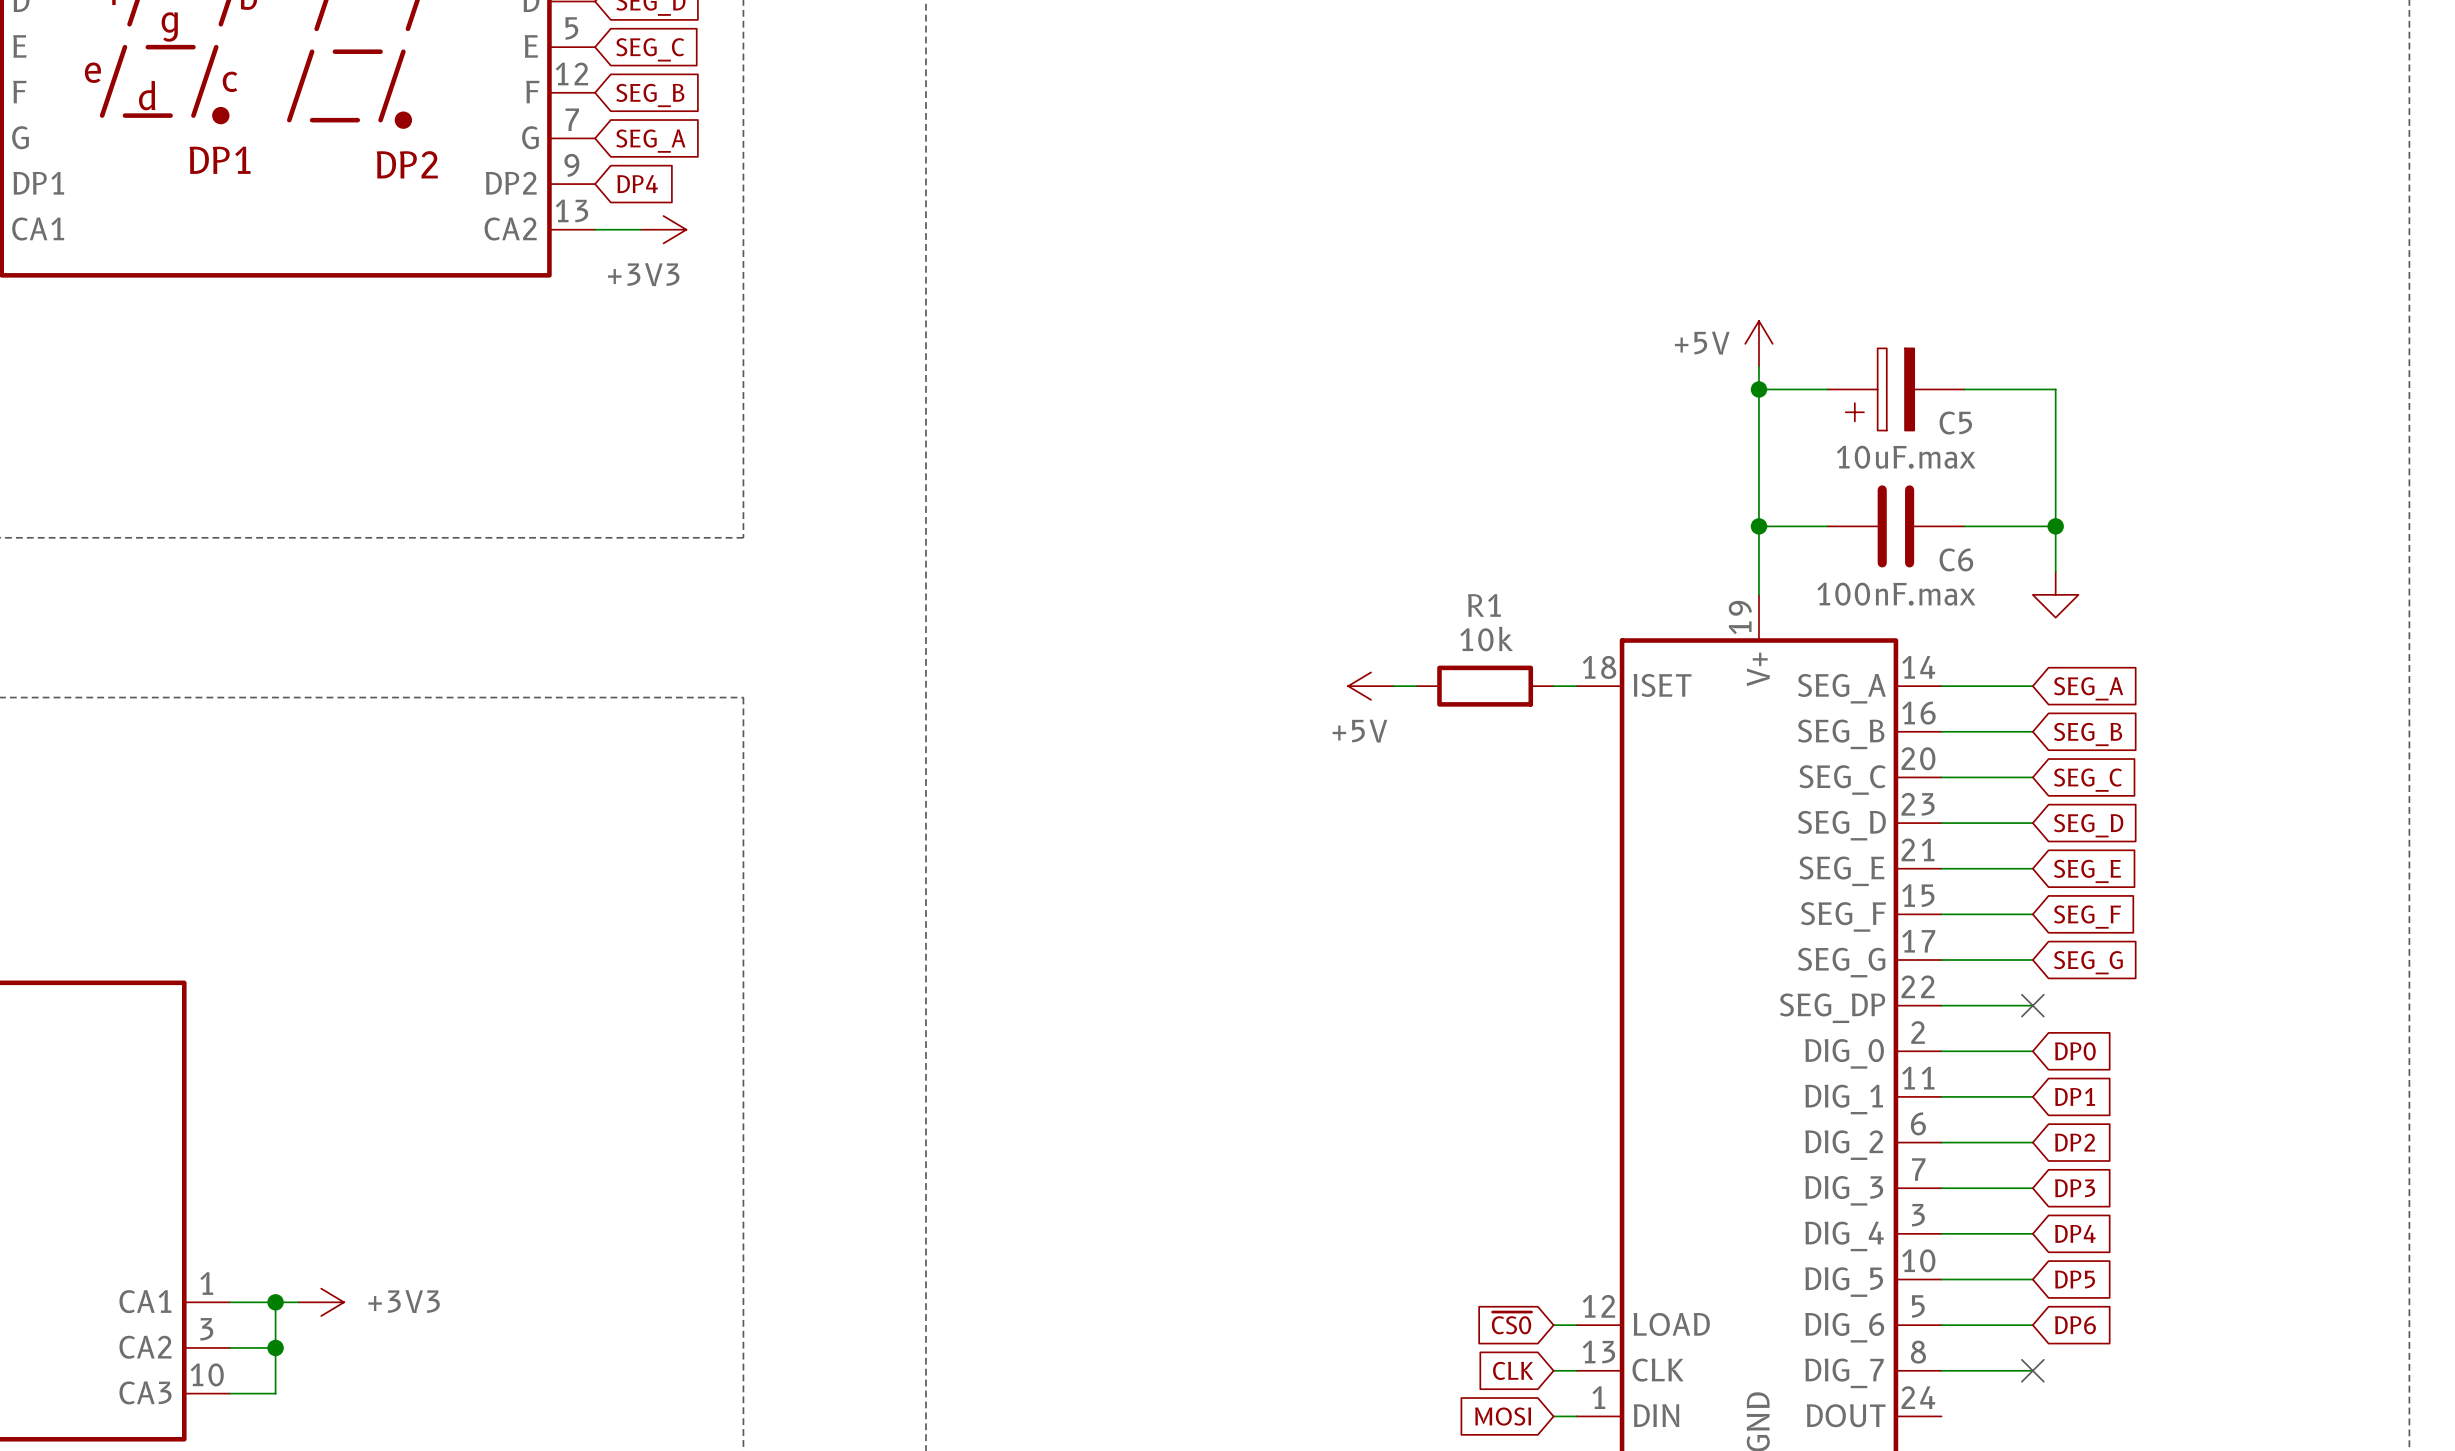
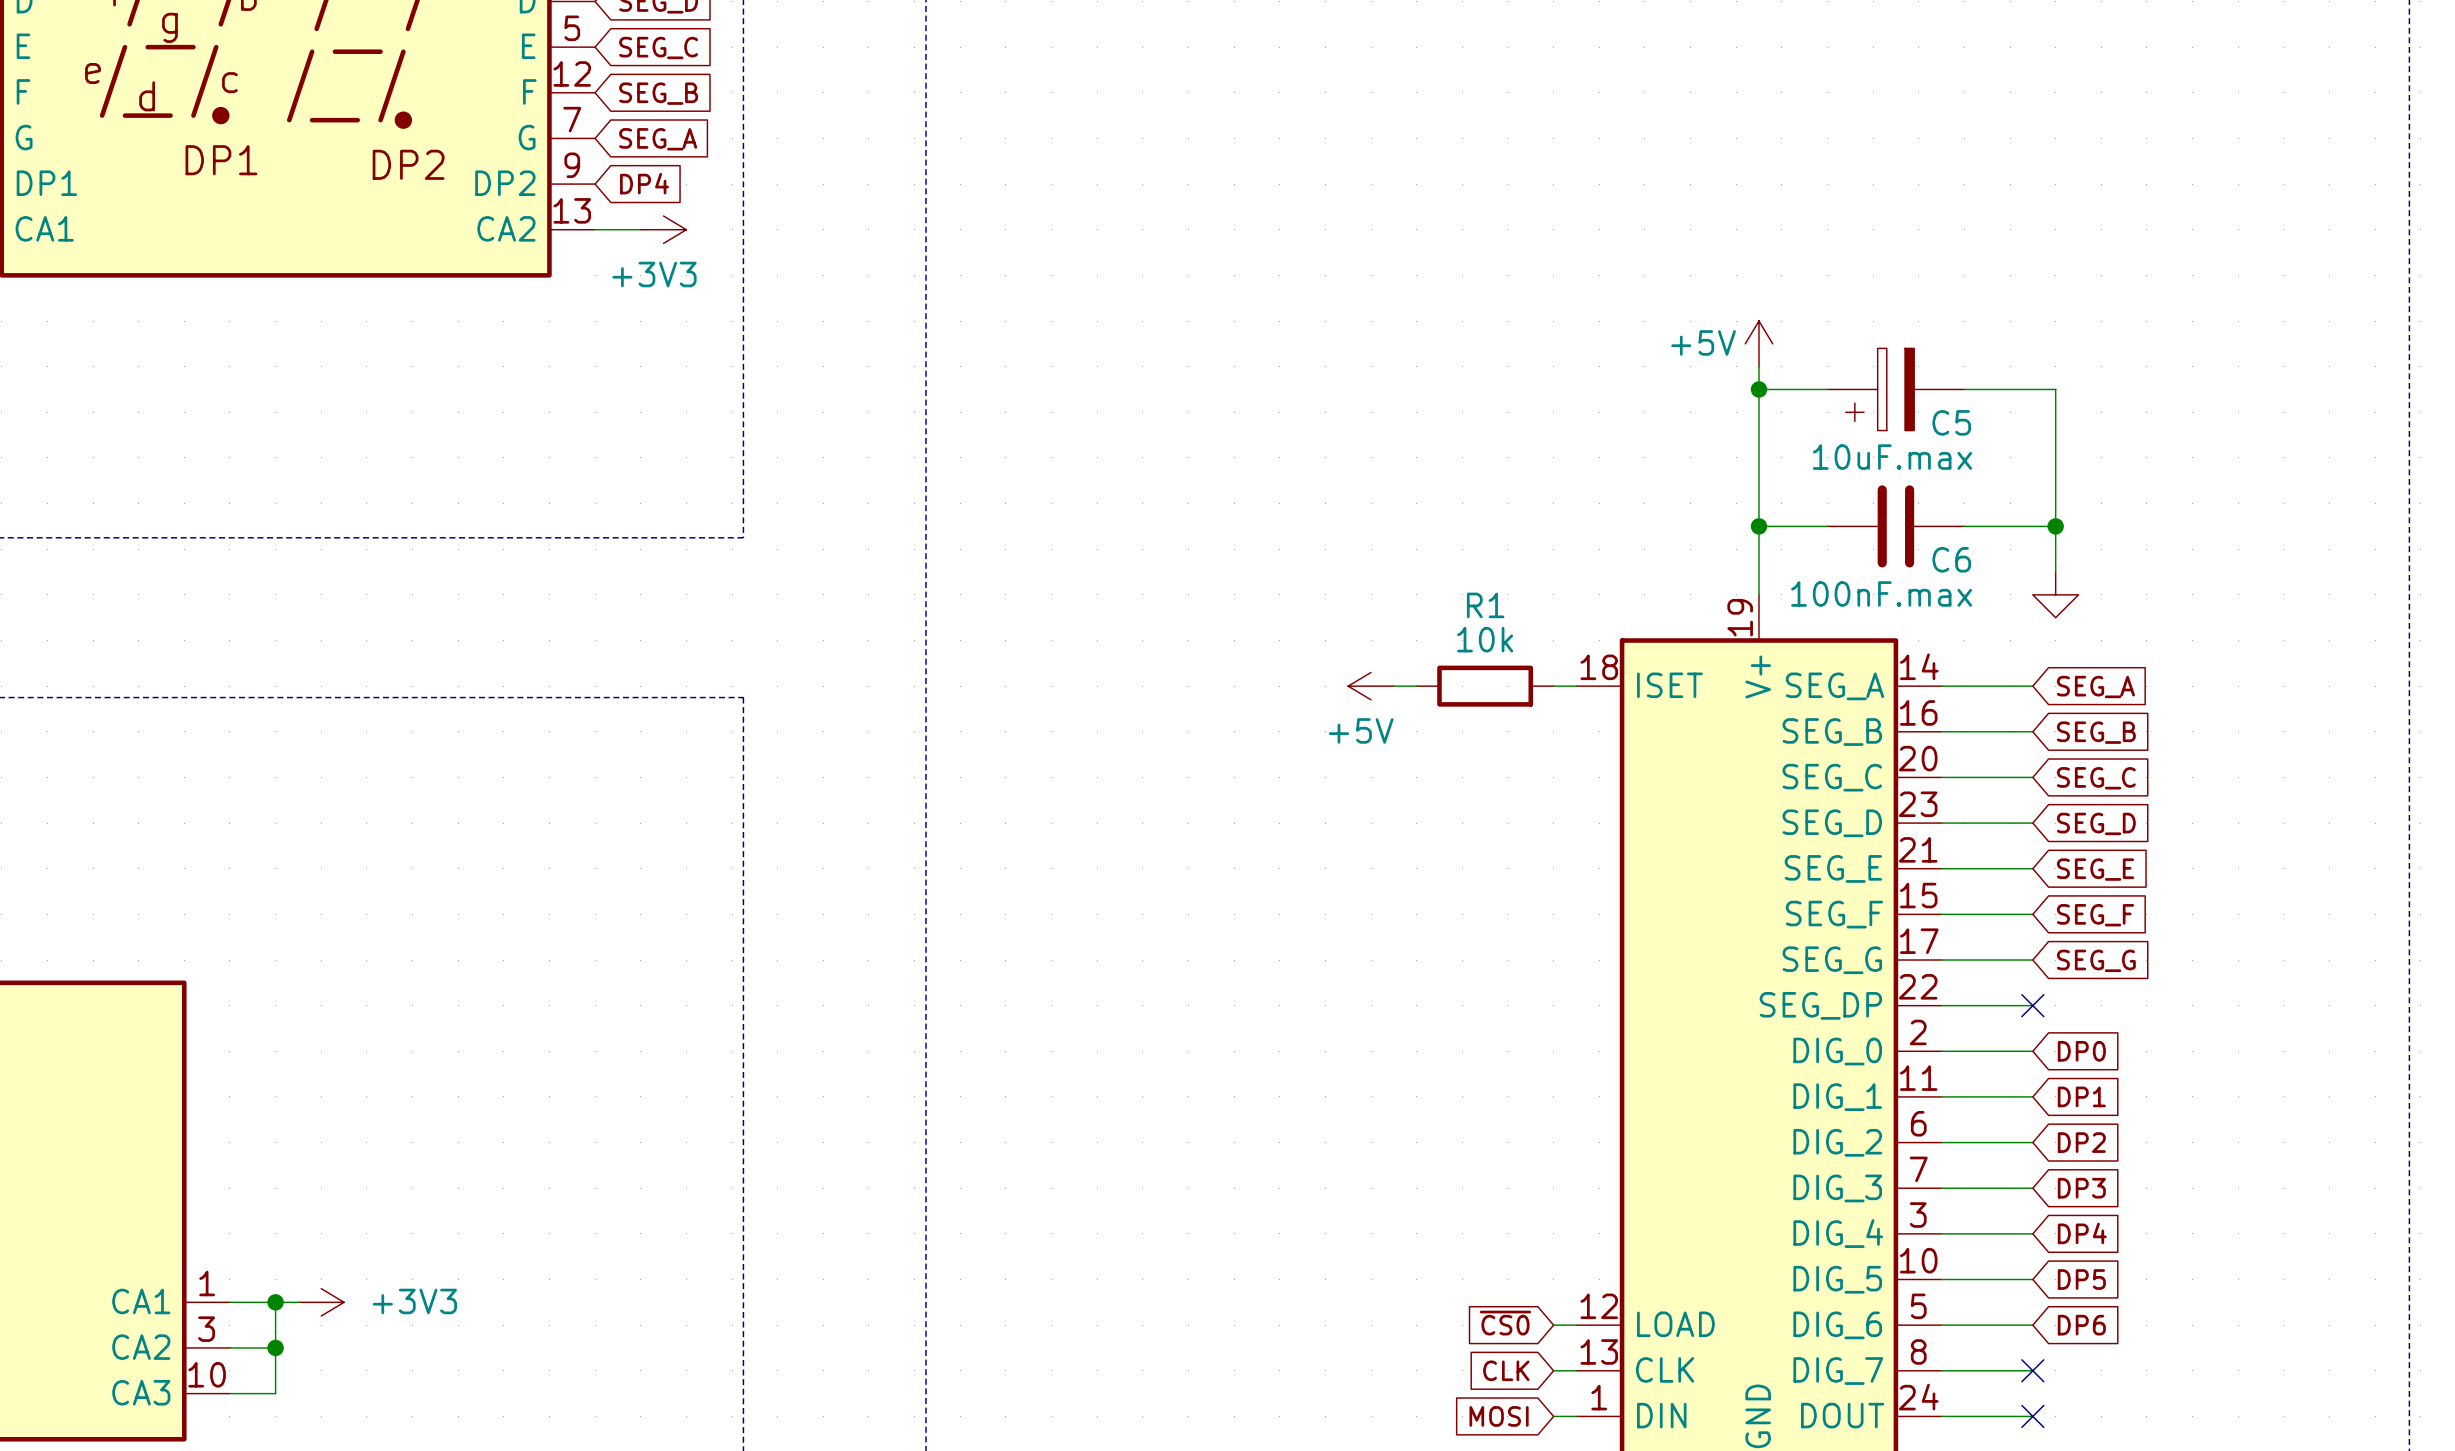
wire: none -> (1941, 1416) (2032, 1416)
no-connect mark: none -> (2032, 1416)

